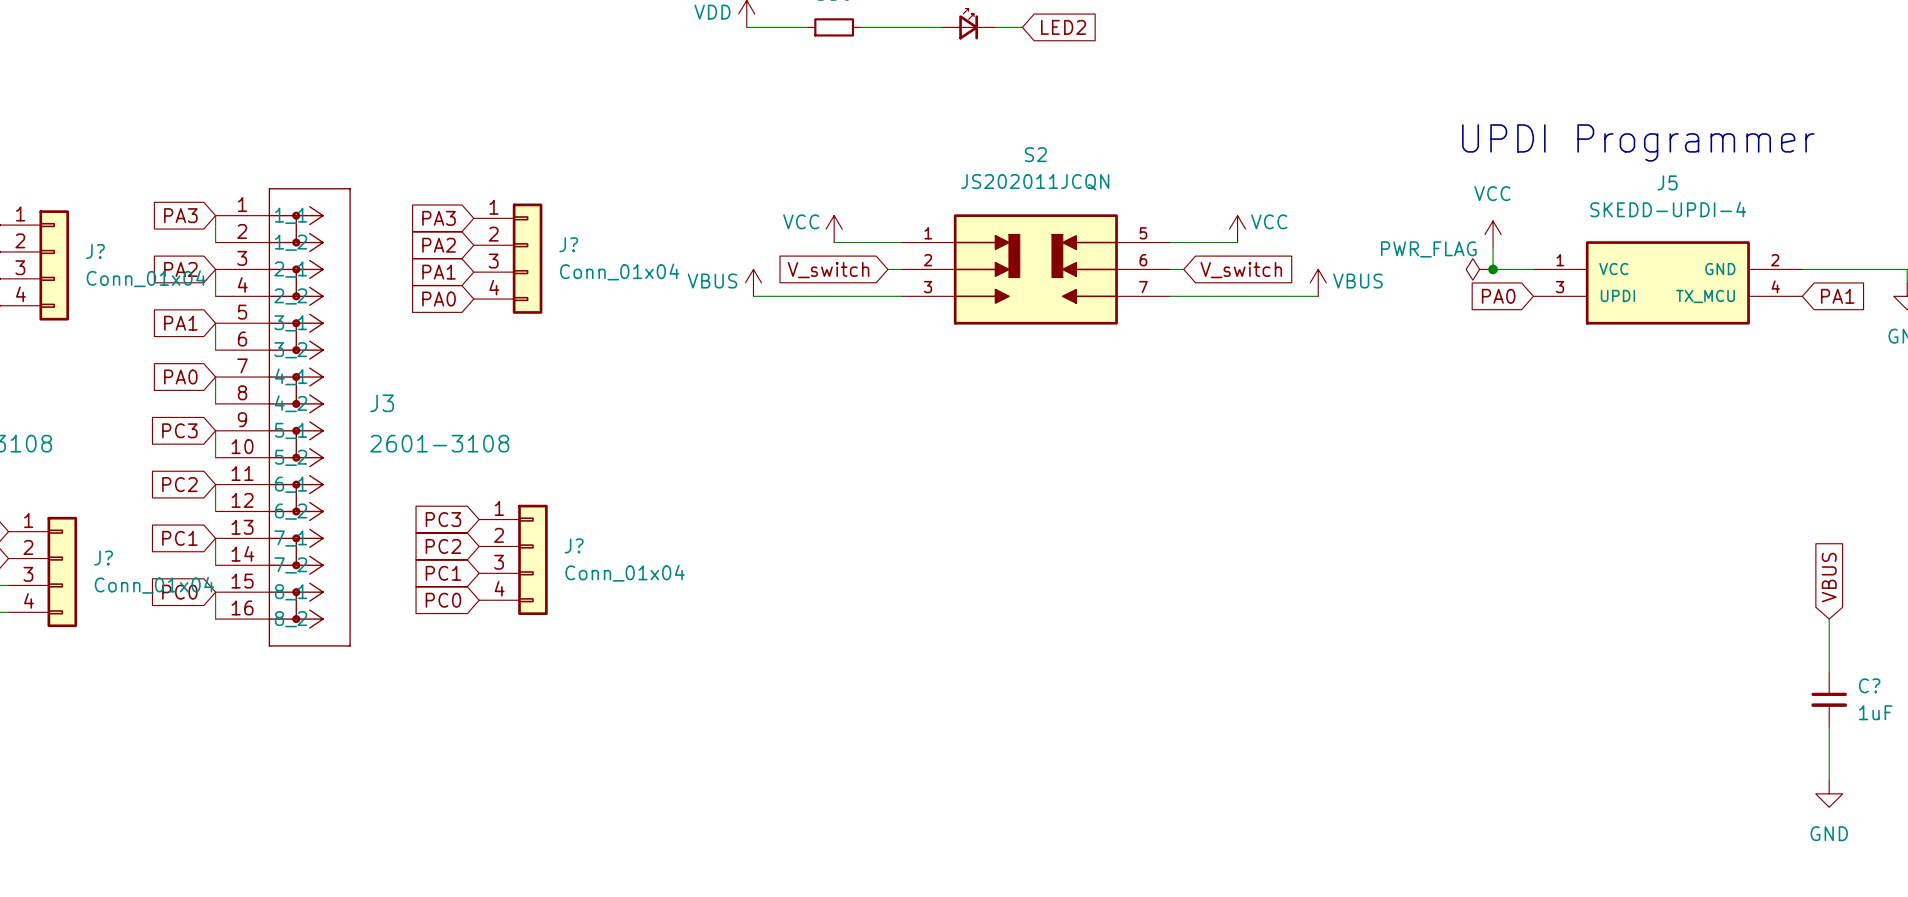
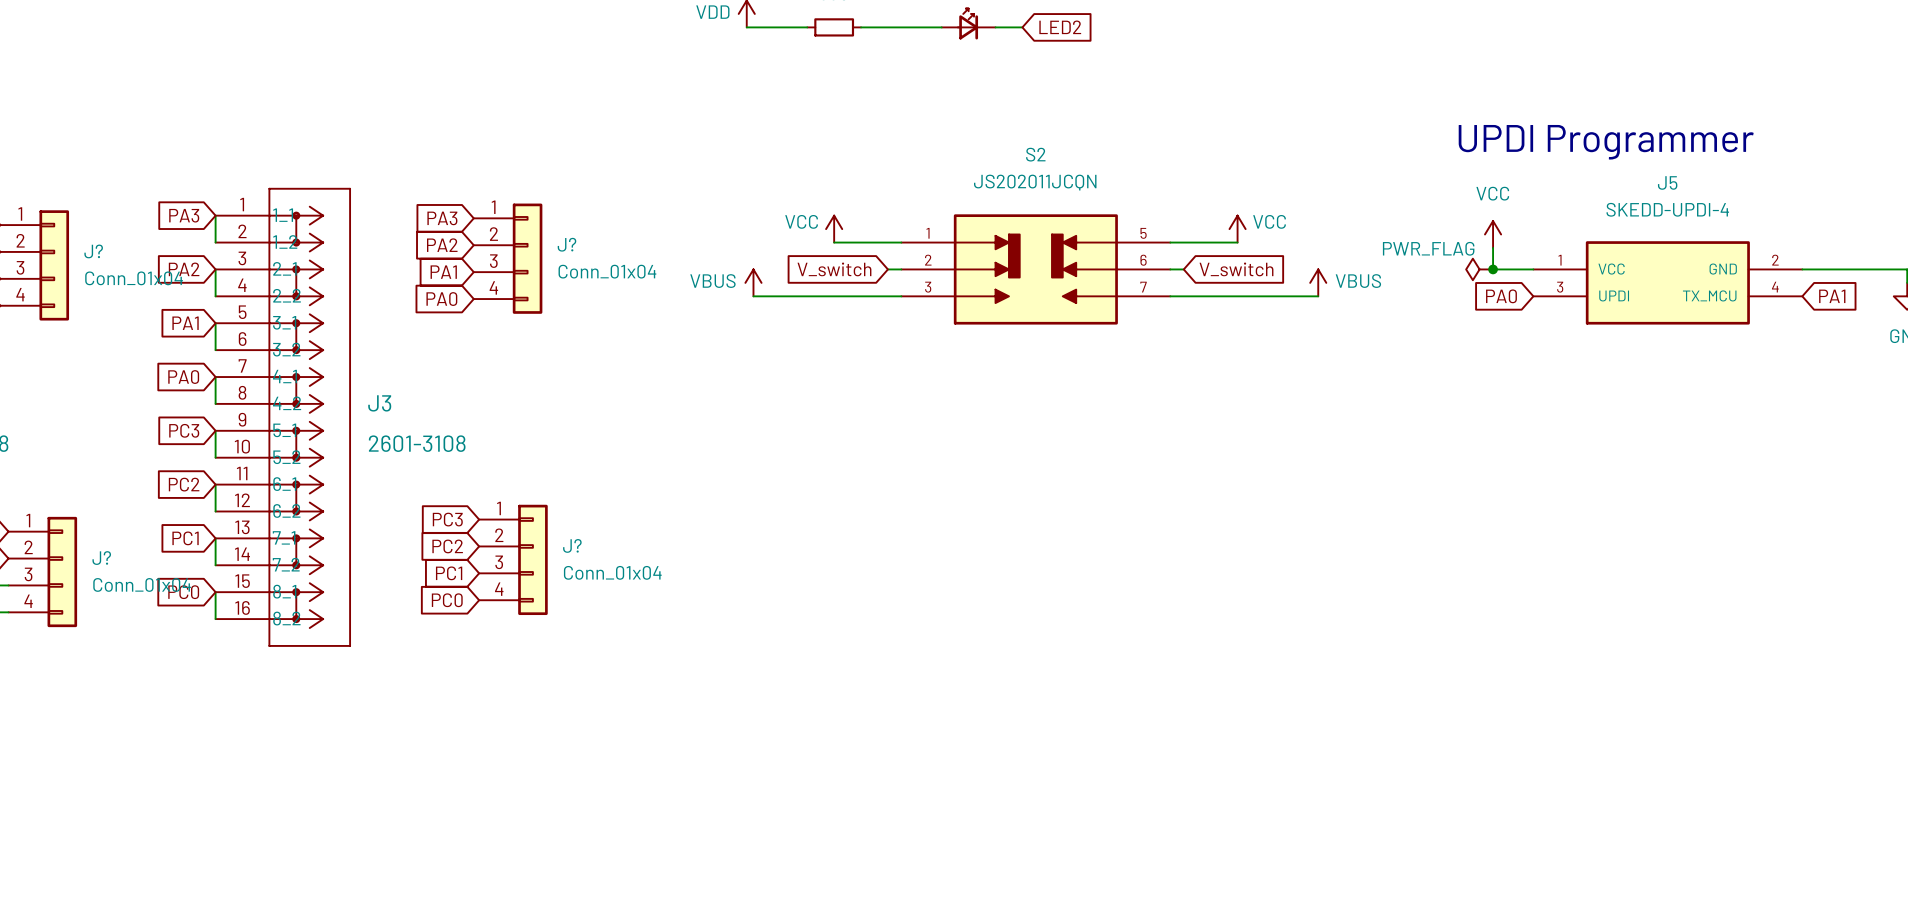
global label: VBUS (1829, 577) -> none
wire: (1829, 619) (1829, 672) -> none
C?: 1uF (1829, 699) -> none
wire: (1829, 726) (1829, 780) -> none
power symbol: GND (1829, 793) -> none

